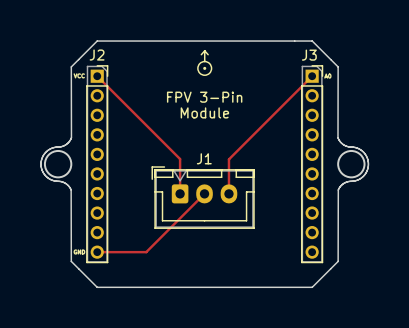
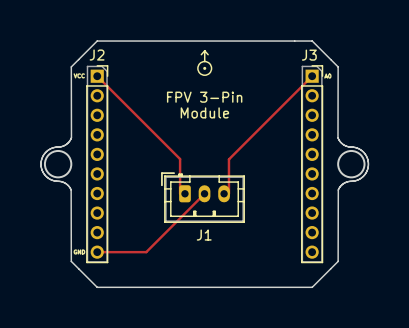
J1 name position: J1 (204, 158) -> J1 (204, 235)
J1 footprint: [151, 166, 255, 229] -> [161, 172, 245, 223]

